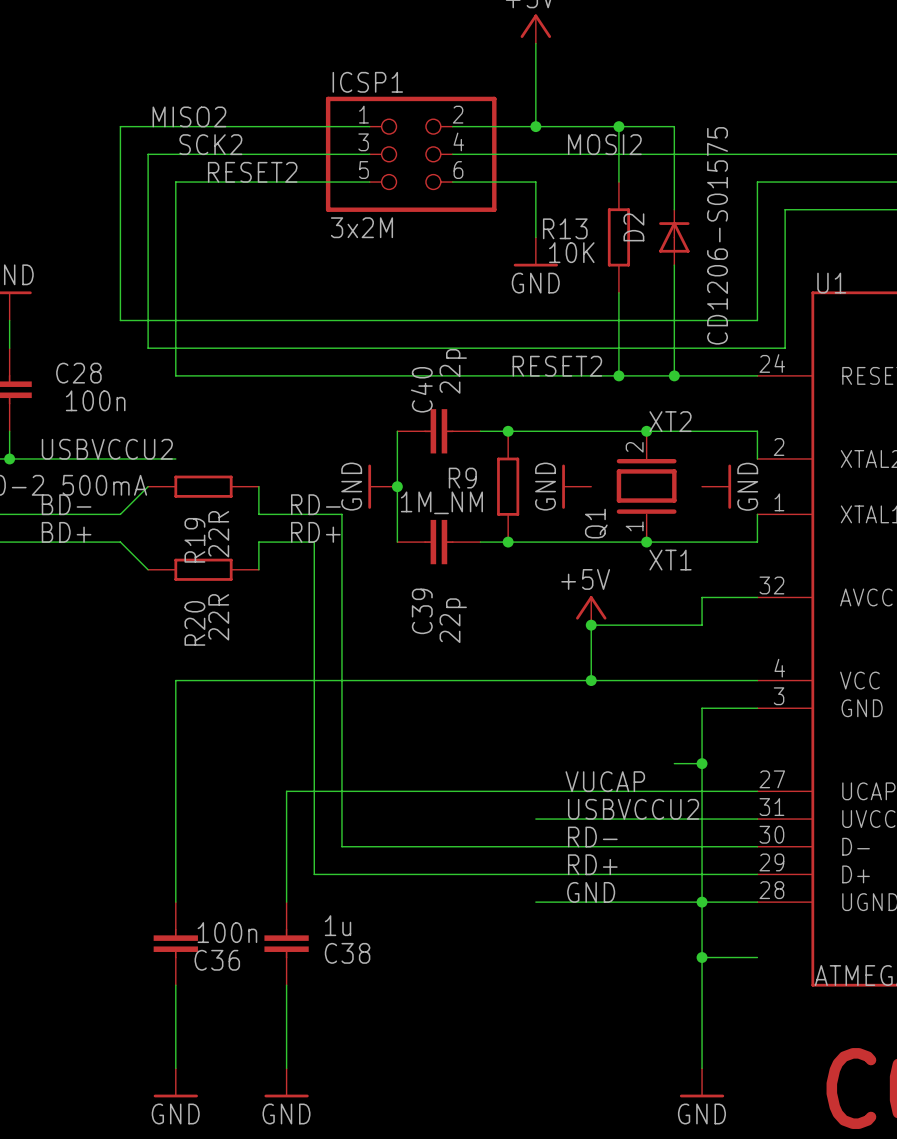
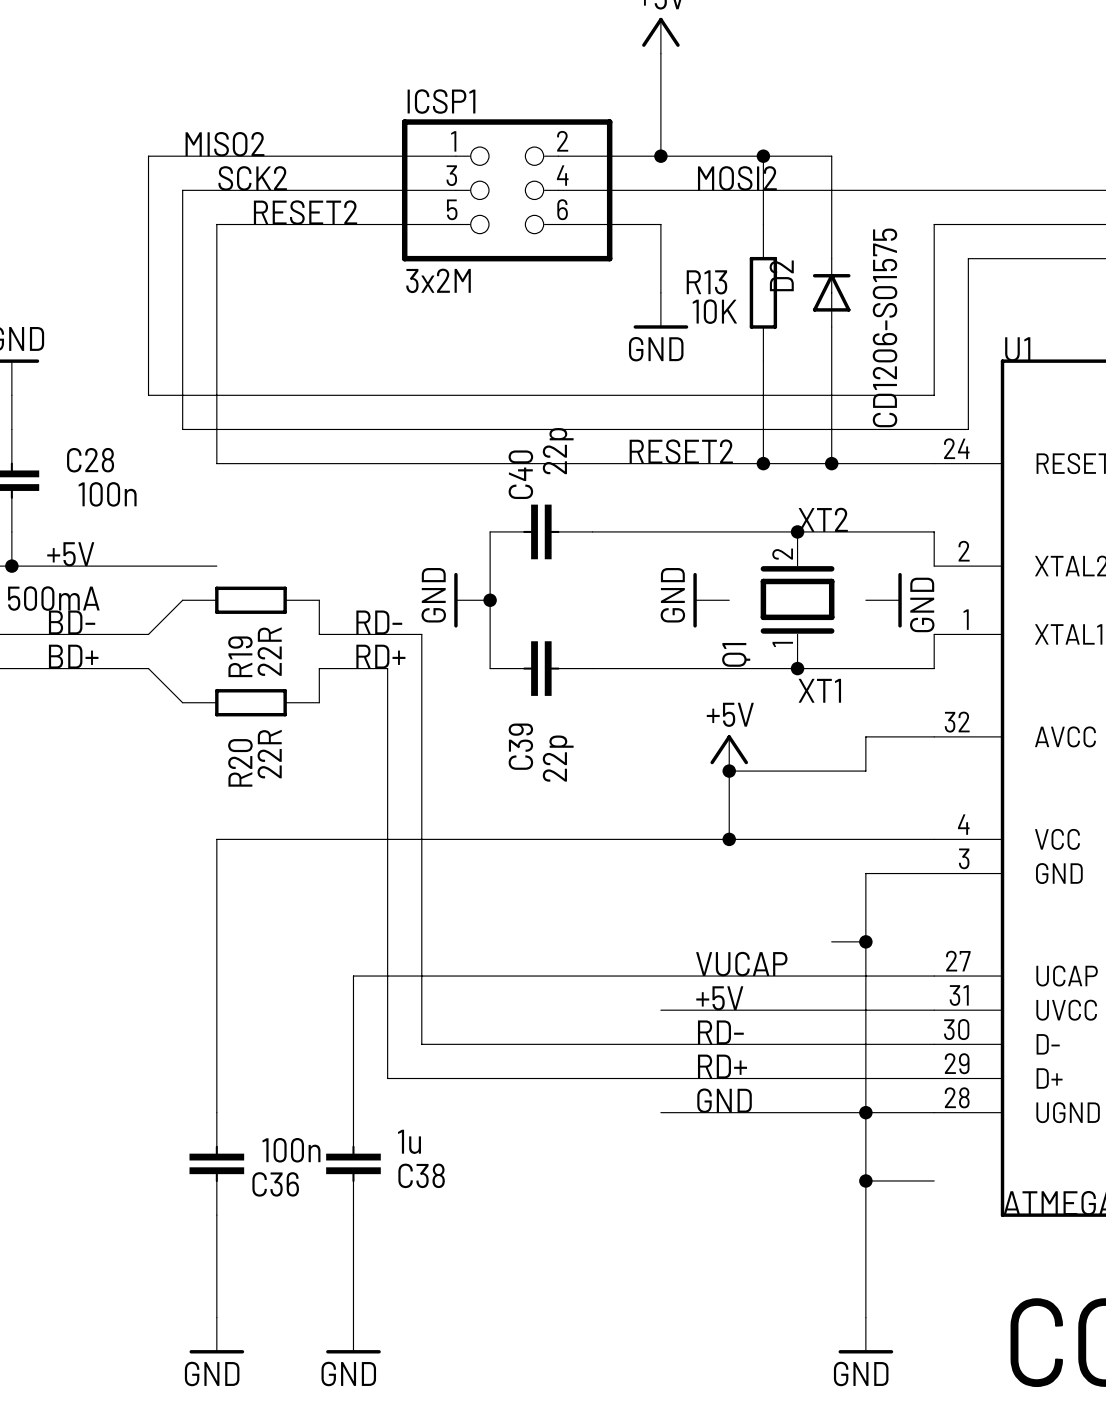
junction: (508, 431) -> none
label: USBVCCU2 (107, 449) -> +5V (70, 554)
R9: 1M_NM (508, 486) -> none
junction: (508, 542) -> none
label: USBVCCU2 (633, 809) -> +5V (719, 998)

